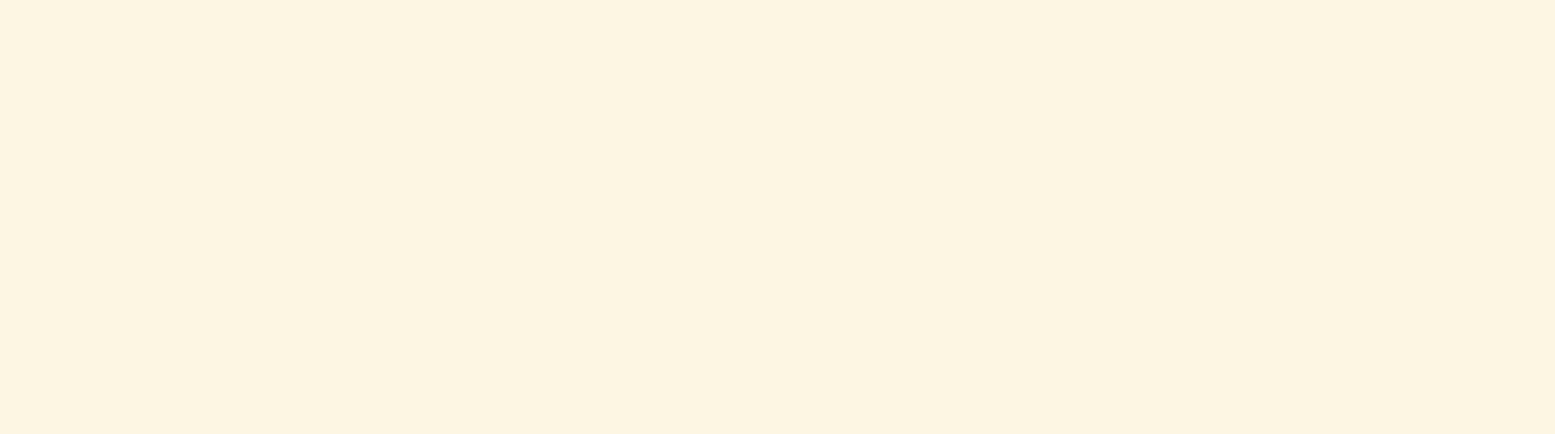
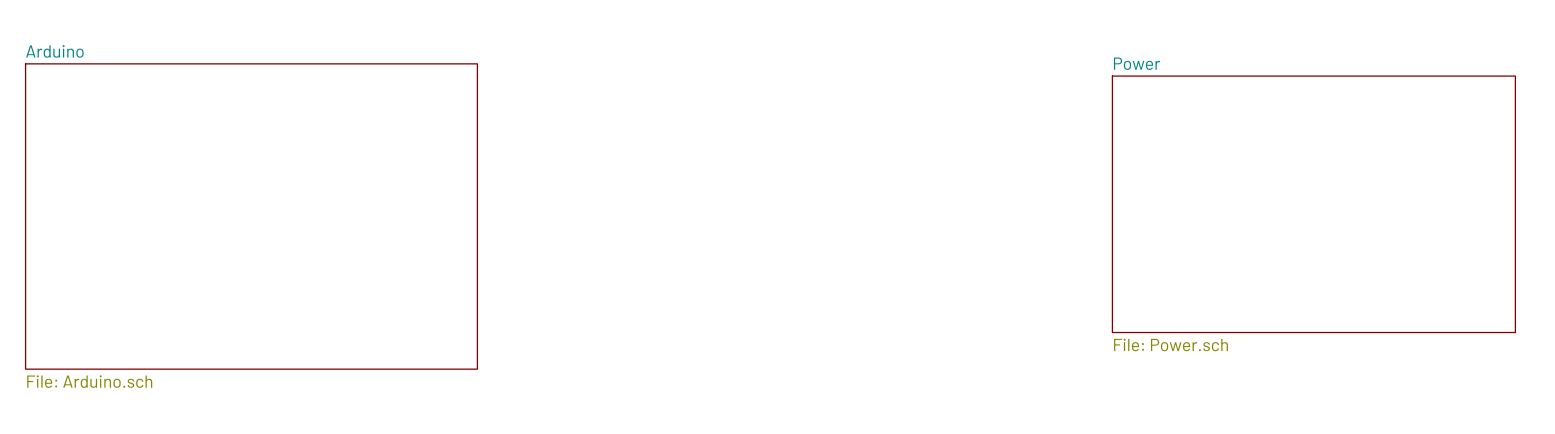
sheet Power: none -> File: Power.sch (1313, 204)
sheet Arduino: none -> File: Arduino.sch (251, 216)

